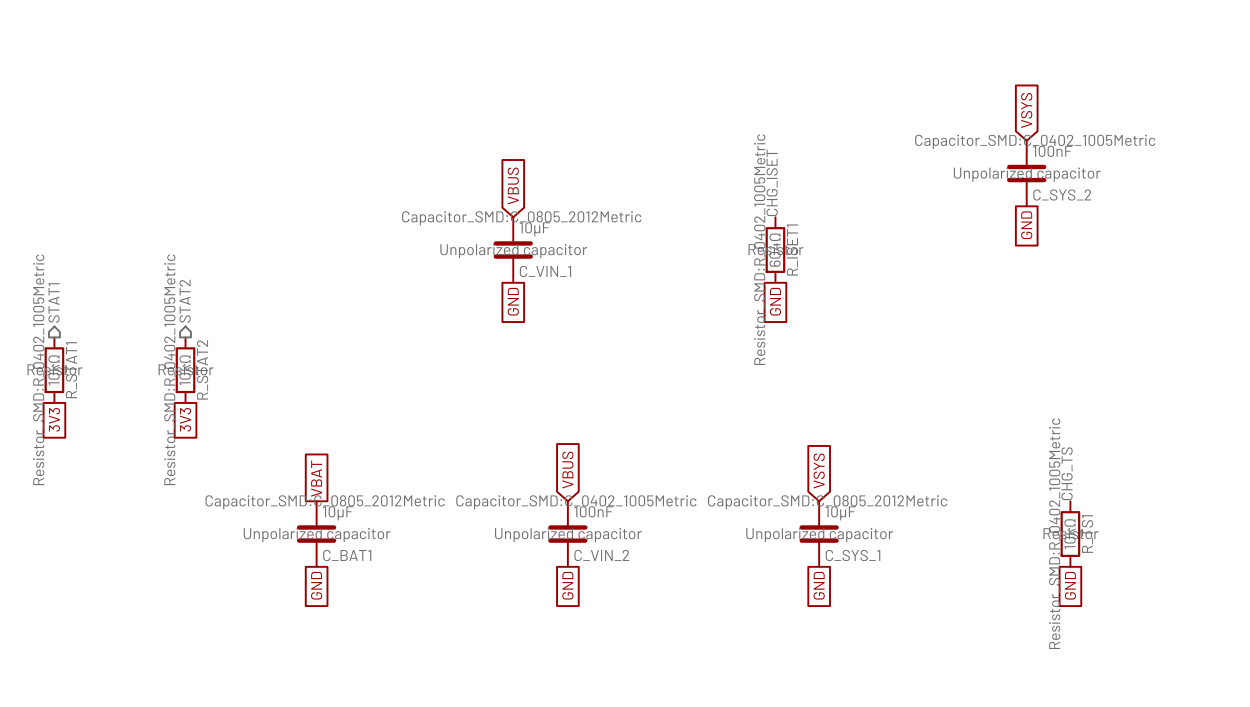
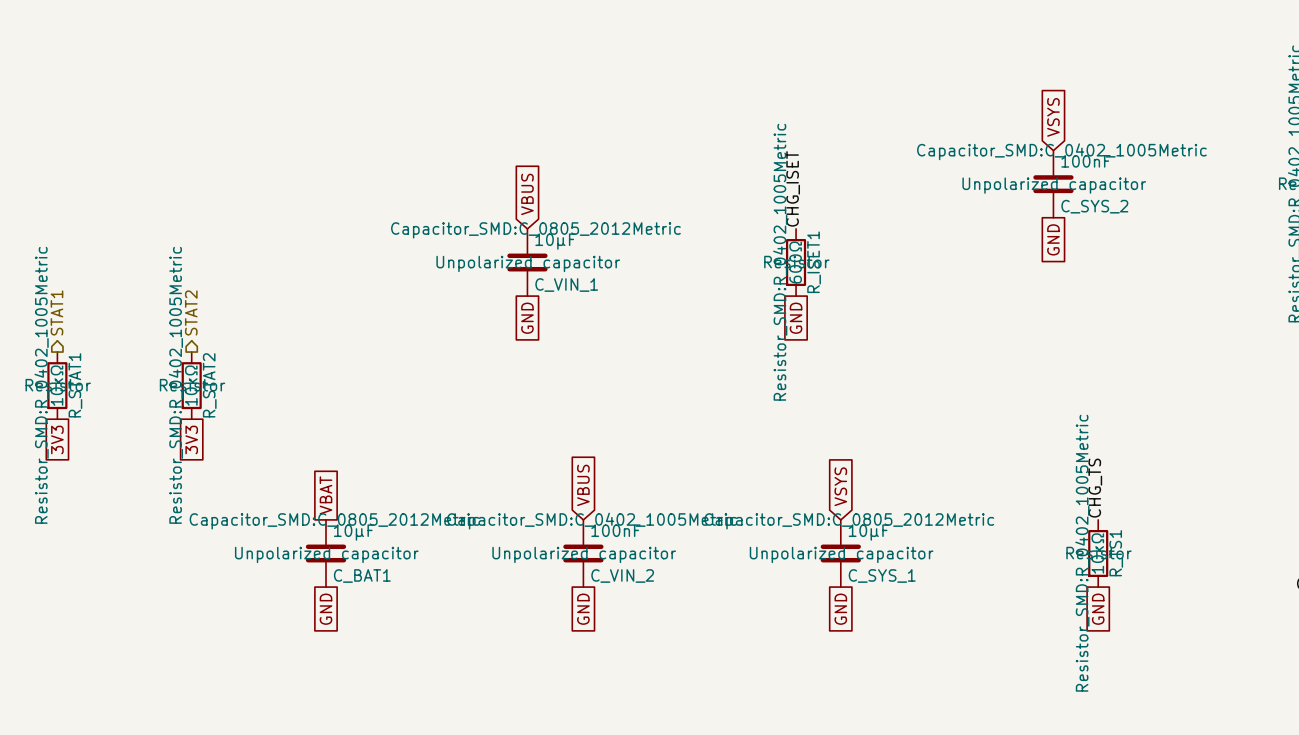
R_ISET1 value: 604Ω (775, 250) -> 600Ω (795, 262)

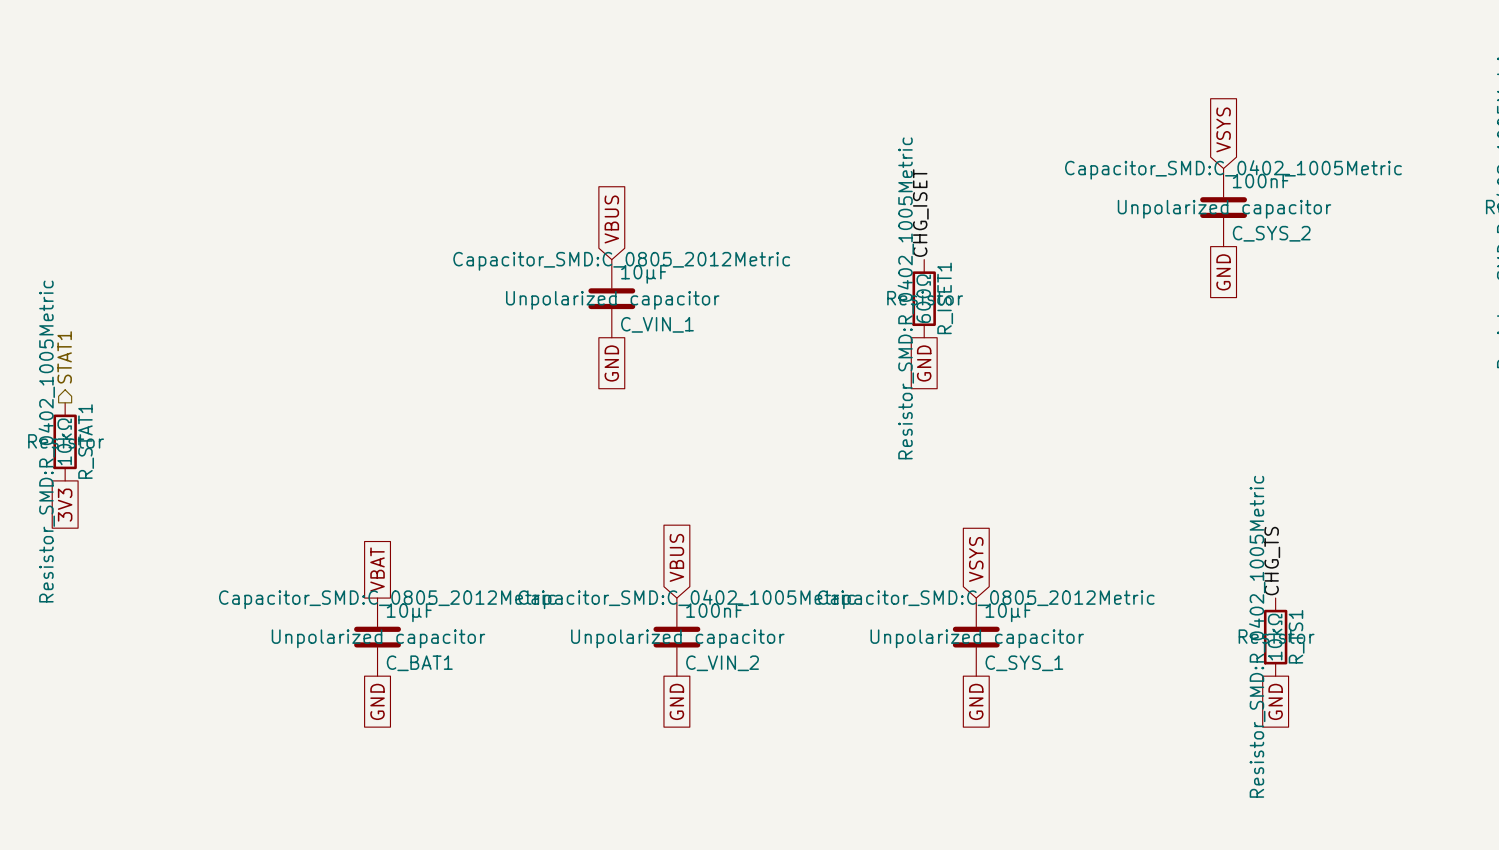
hierarchical label: STAT2 (191, 312) -> none
R_STAT2: 10kΩ (191, 385) -> none
global label: 3V3 (191, 439) -> none

